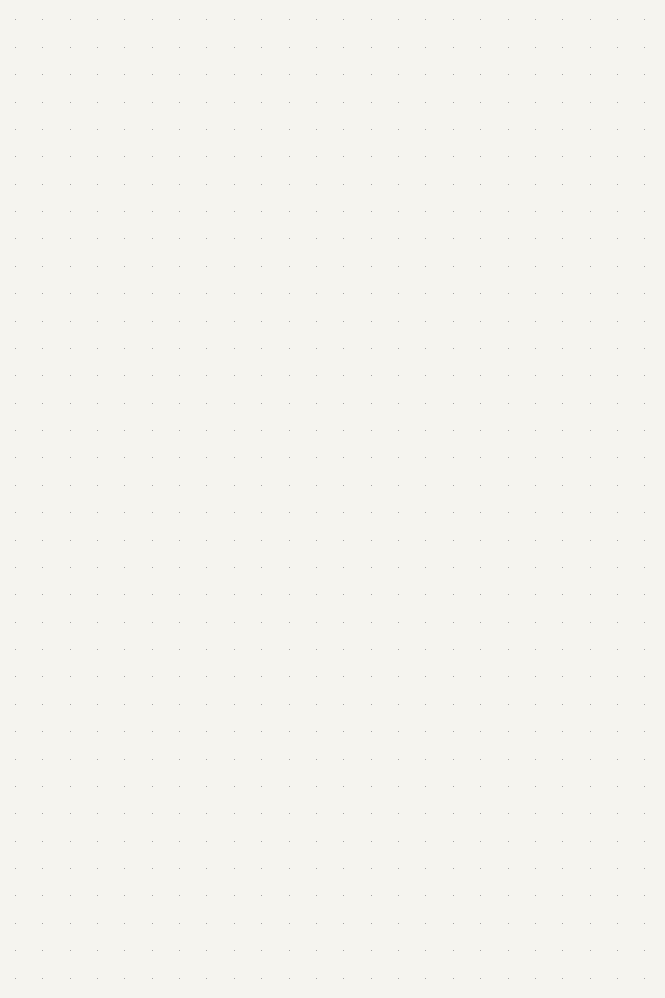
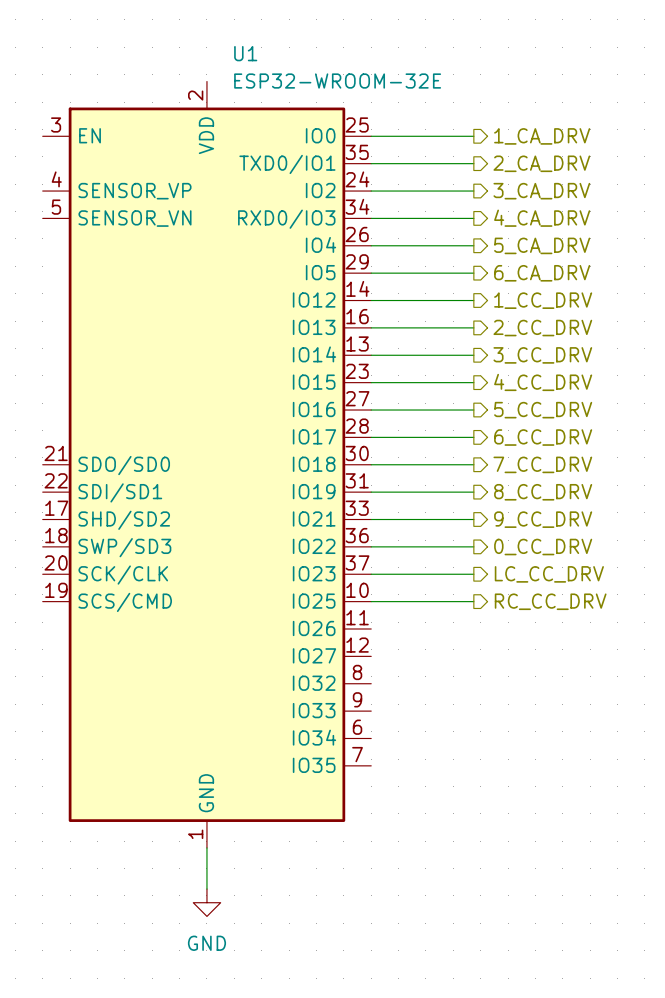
wire: none -> (371, 136) (473, 136)
hierarchical label: none -> 1_CA_DRV (542, 136)
wire: none -> (371, 163) (473, 163)
hierarchical label: none -> 2_CA_DRV (541, 163)
wire: none -> (371, 191) (473, 191)
hierarchical label: none -> 3_CA_DRV (541, 191)
wire: none -> (371, 218) (473, 218)
hierarchical label: none -> 4_CA_DRV (542, 218)
wire: none -> (371, 245) (473, 245)
hierarchical label: none -> 5_CA_DRV (542, 245)
wire: none -> (371, 273) (473, 273)
hierarchical label: none -> 6_CA_DRV (542, 273)
wire: none -> (371, 300) (473, 300)
hierarchical label: none -> 1_CC_DRV (543, 300)
wire: none -> (371, 327) (473, 327)
hierarchical label: none -> 2_CC_DRV (542, 328)
wire: none -> (371, 355) (473, 355)
hierarchical label: none -> 3_CC_DRV (542, 355)
wire: none -> (371, 382) (473, 382)
hierarchical label: none -> 4_CC_DRV (543, 382)
wire: none -> (371, 410) (473, 410)
hierarchical label: none -> 5_CC_DRV (543, 410)
wire: none -> (371, 437) (473, 437)
hierarchical label: none -> 6_CC_DRV (543, 437)
U1: none -> ESP32-WROOM-32E (206, 464)
wire: none -> (371, 464) (473, 464)
hierarchical label: none -> 7_CC_DRV (542, 464)
wire: none -> (371, 492) (473, 492)
hierarchical label: none -> 8_CC_DRV (543, 492)
wire: none -> (371, 519) (473, 519)
hierarchical label: none -> 9_CC_DRV (543, 519)
wire: none -> (371, 546) (473, 546)
hierarchical label: none -> 0_CC_DRV (543, 547)
wire: none -> (371, 574) (473, 574)
hierarchical label: none -> LC_CC_DRV (549, 574)
wire: none -> (371, 601) (473, 601)
hierarchical label: none -> RC_CC_DRV (550, 601)
wire: none -> (206, 847) (206, 889)
power symbol: none -> GND (206, 902)

